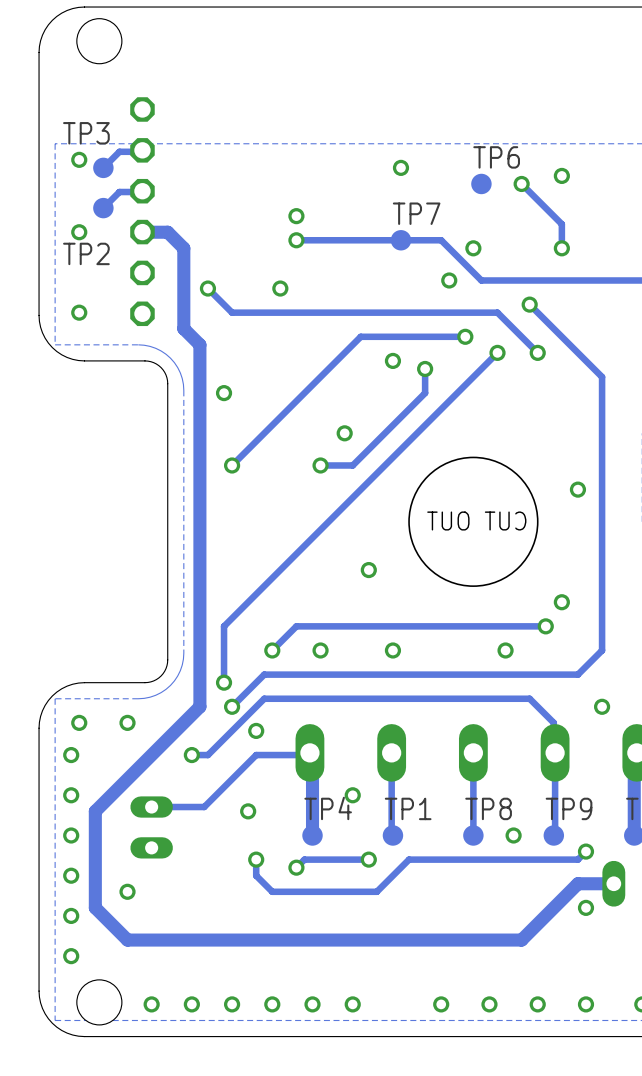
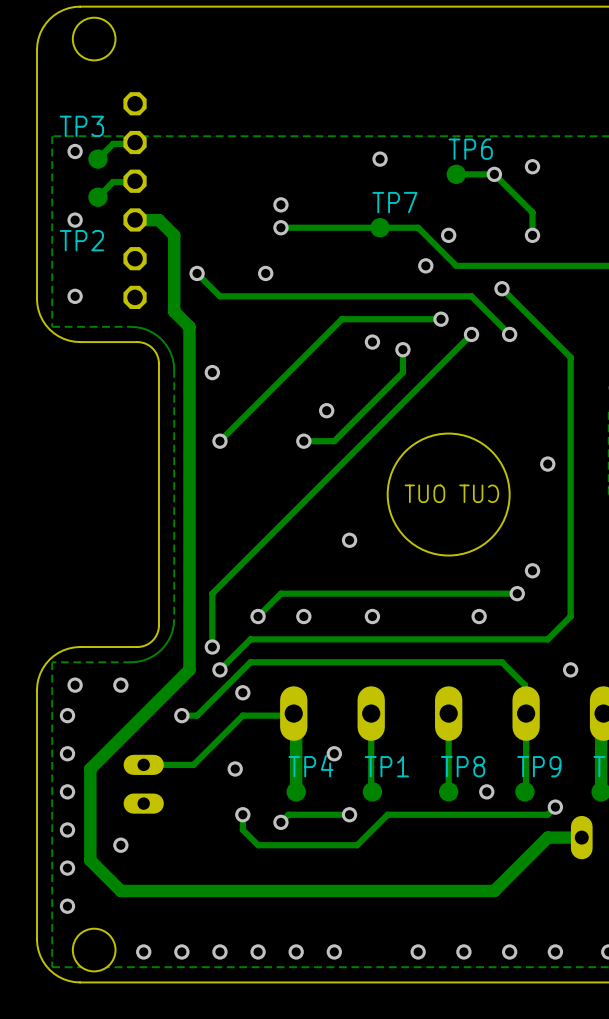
track: none -> (494, 174) (456, 174)
via: (585, 907) -> none

